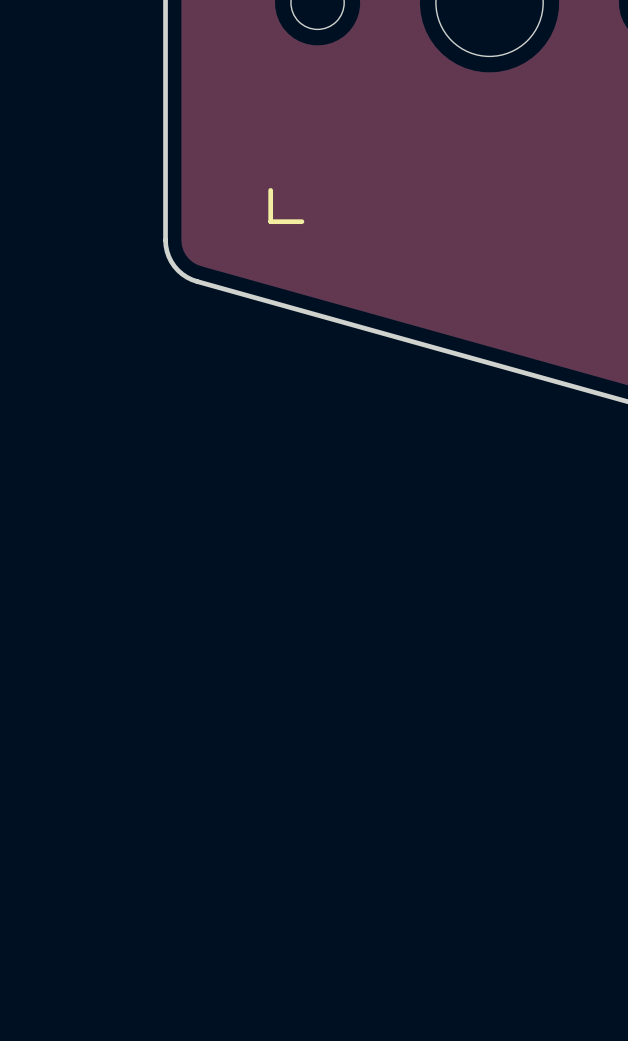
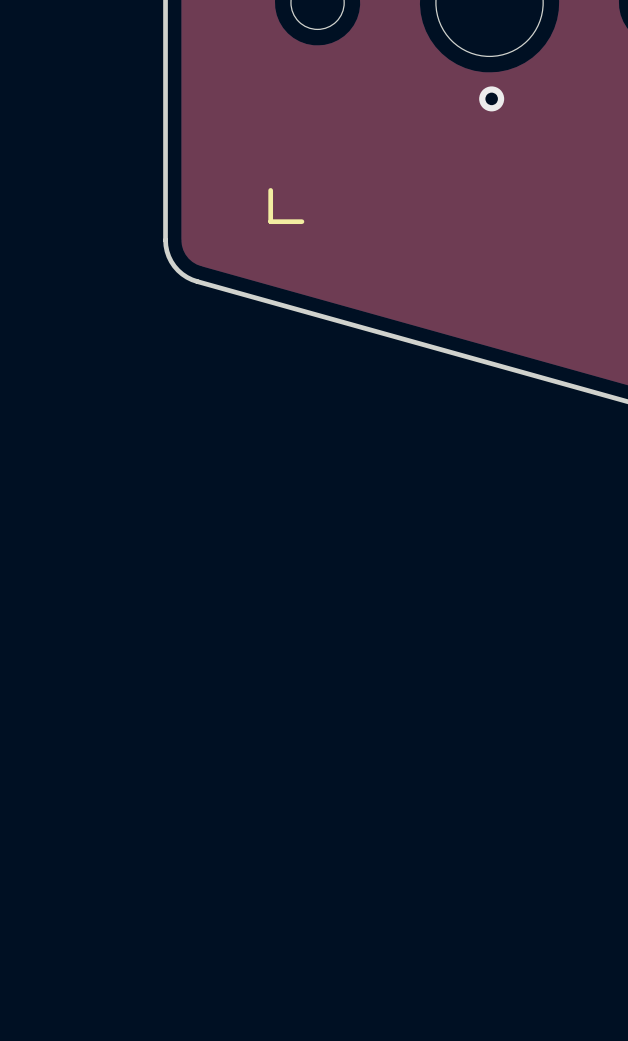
via: none -> (491, 98)

